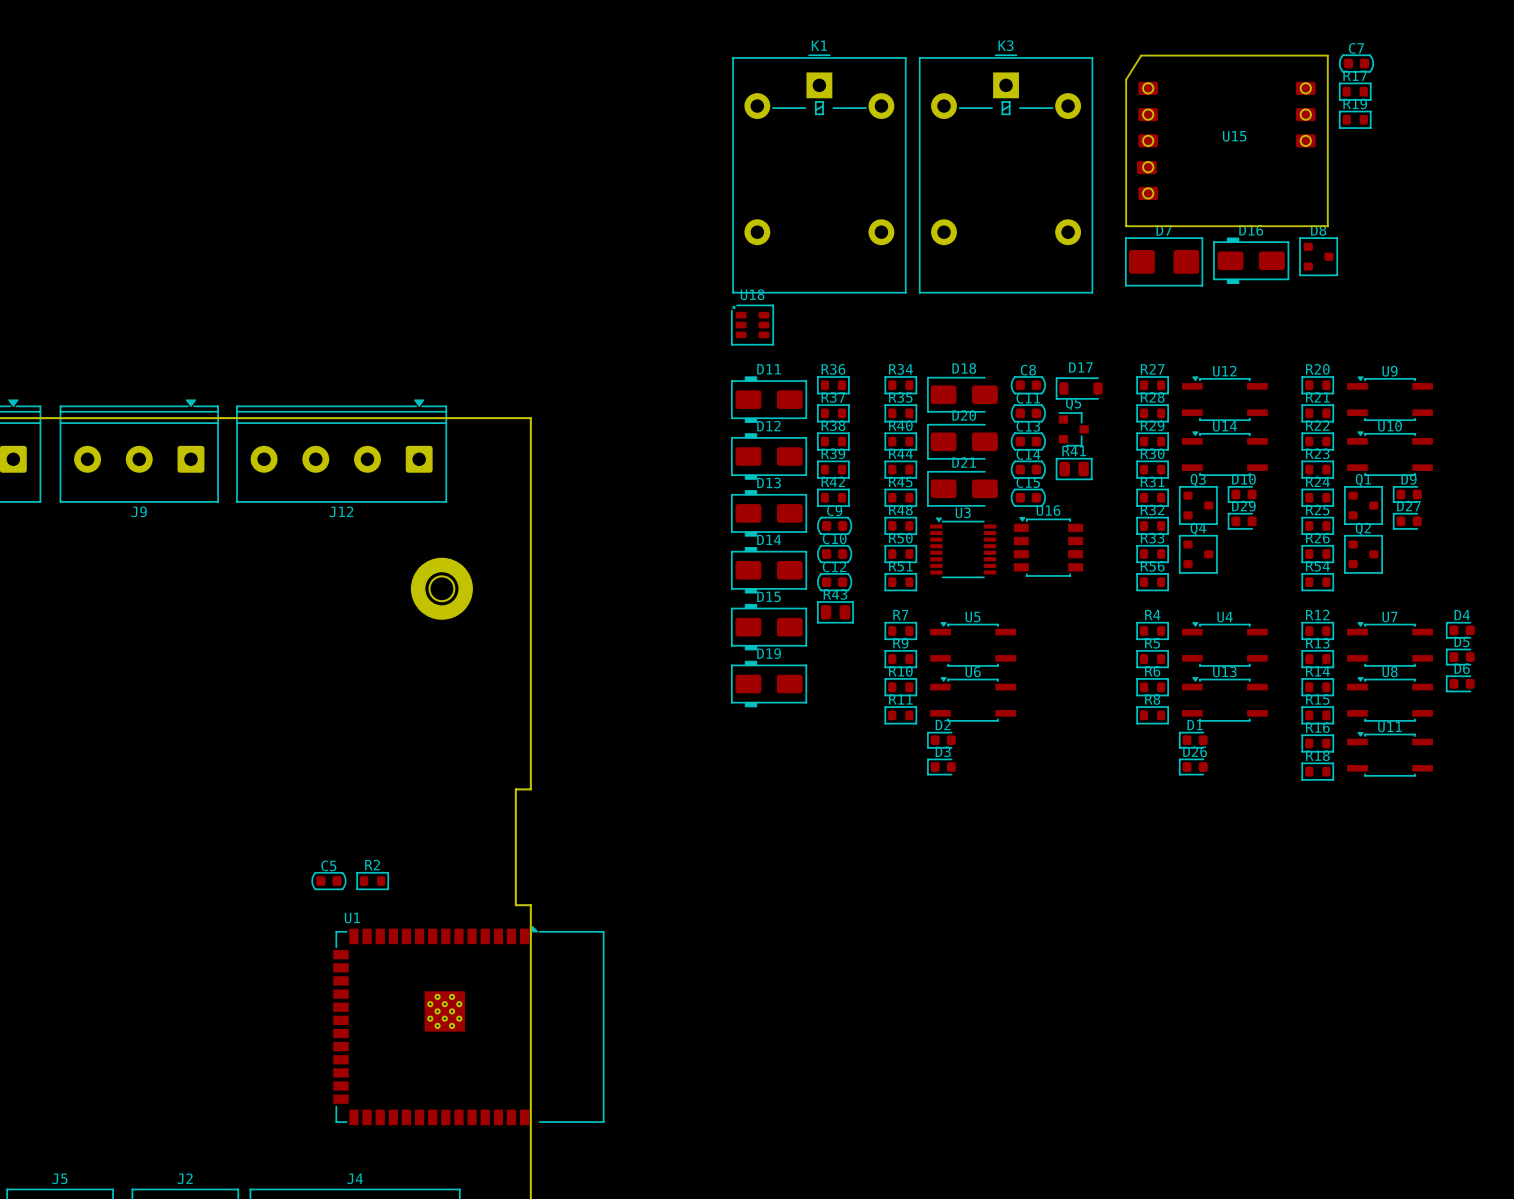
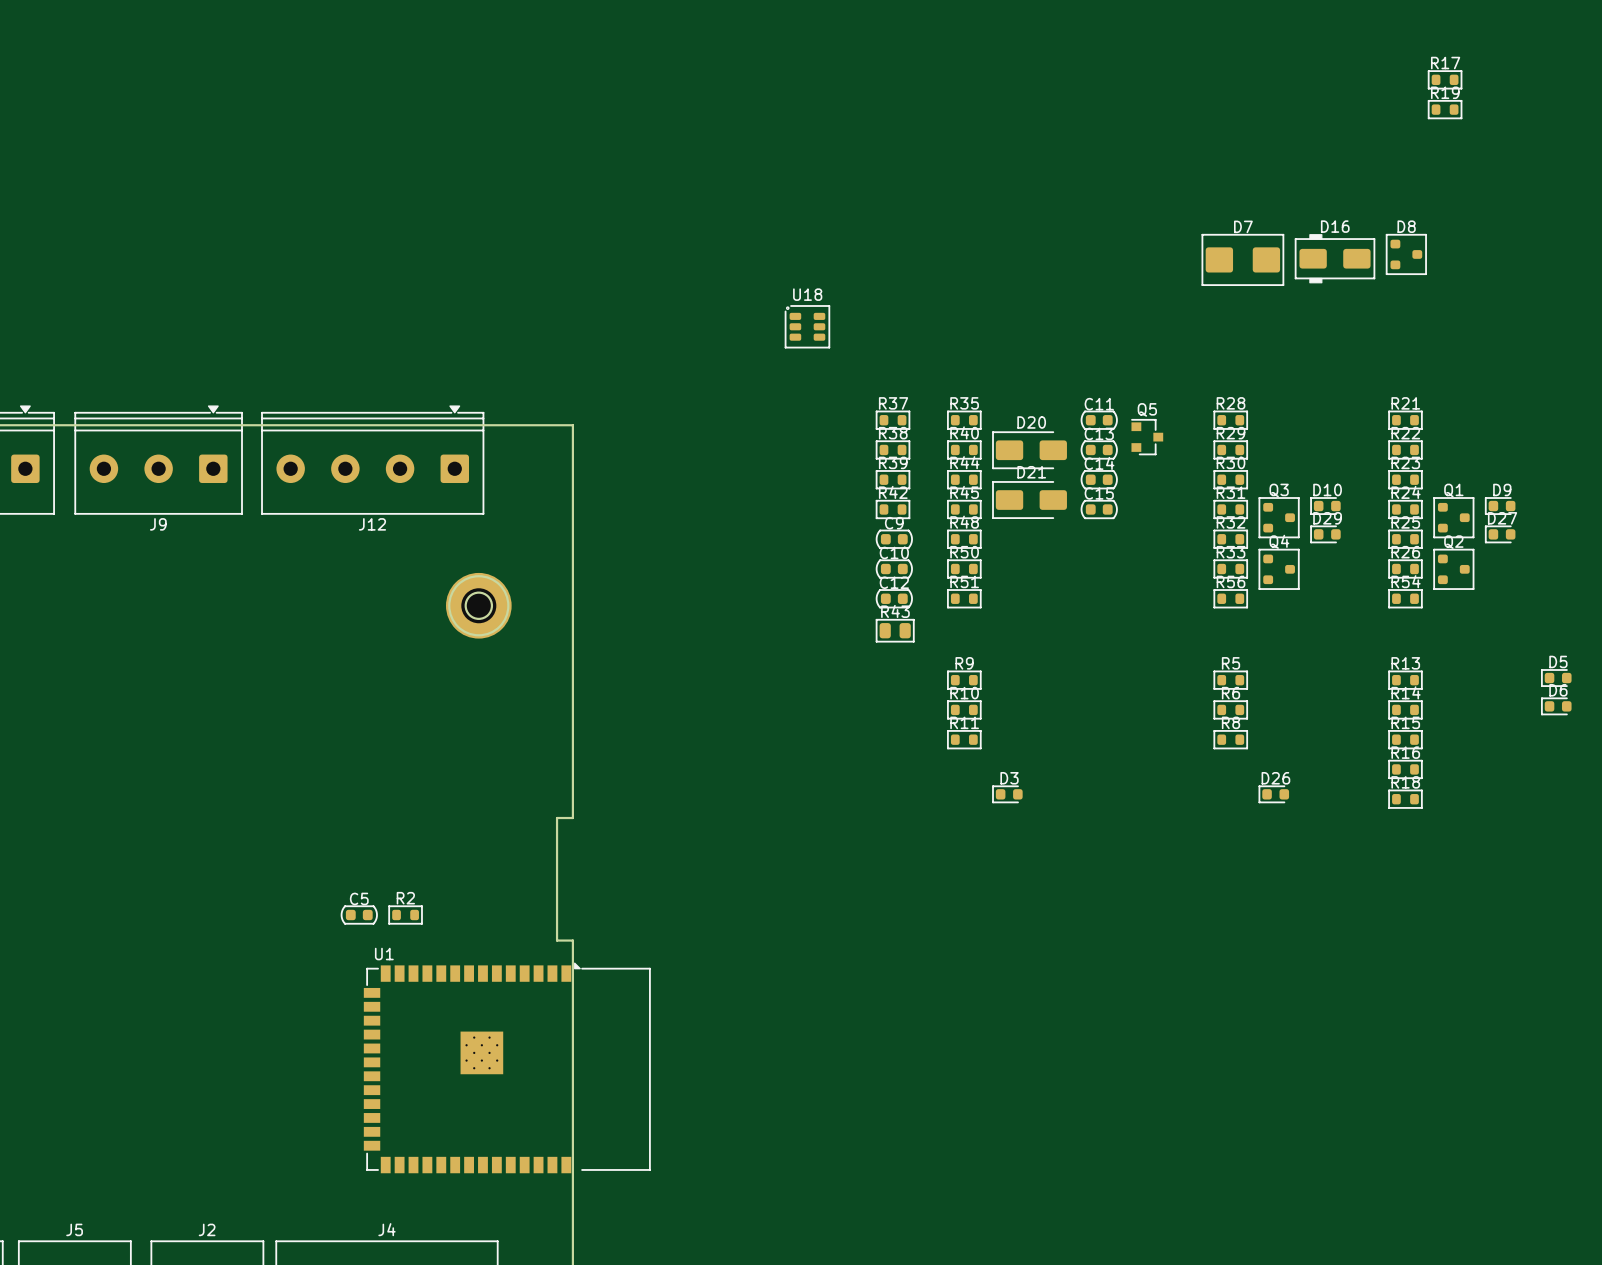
C7: (1356, 63) -> none
U15: (1226, 140) -> none
K1: (819, 173) -> none
K3: (1006, 173) -> none
R36: (833, 385) -> none
R34: (900, 385) -> none
C8: (1028, 385) -> none
R27: (1152, 385) -> none
R20: (1317, 385) -> none
D17: (1079, 388) -> none
D18: (962, 394) -> none
U12: (1224, 398) -> none
U9: (1390, 398) -> none
D11: (769, 399) -> none
U14: (1224, 453) -> none
U10: (1390, 453) -> none
D12: (769, 456) -> none
R41: (1074, 469) -> none
D13: (769, 513) -> none
U16: (1048, 546) -> none
U3: (963, 547) -> none
D14: (769, 570) -> none
D15: (769, 627) -> none
R7: (900, 630) -> none
R4: (1152, 630) -> none
R12: (1317, 630) -> none
D4: (1460, 630) -> none
U5: (973, 644) -> none
U4: (1224, 644) -> none
U7: (1390, 644) -> none
D19: (769, 684) -> none
U6: (973, 699) -> none
U13: (1224, 699) -> none
U8: (1390, 699) -> none
D2: (941, 740) -> none
D1: (1193, 740) -> none
U11: (1390, 754) -> none

